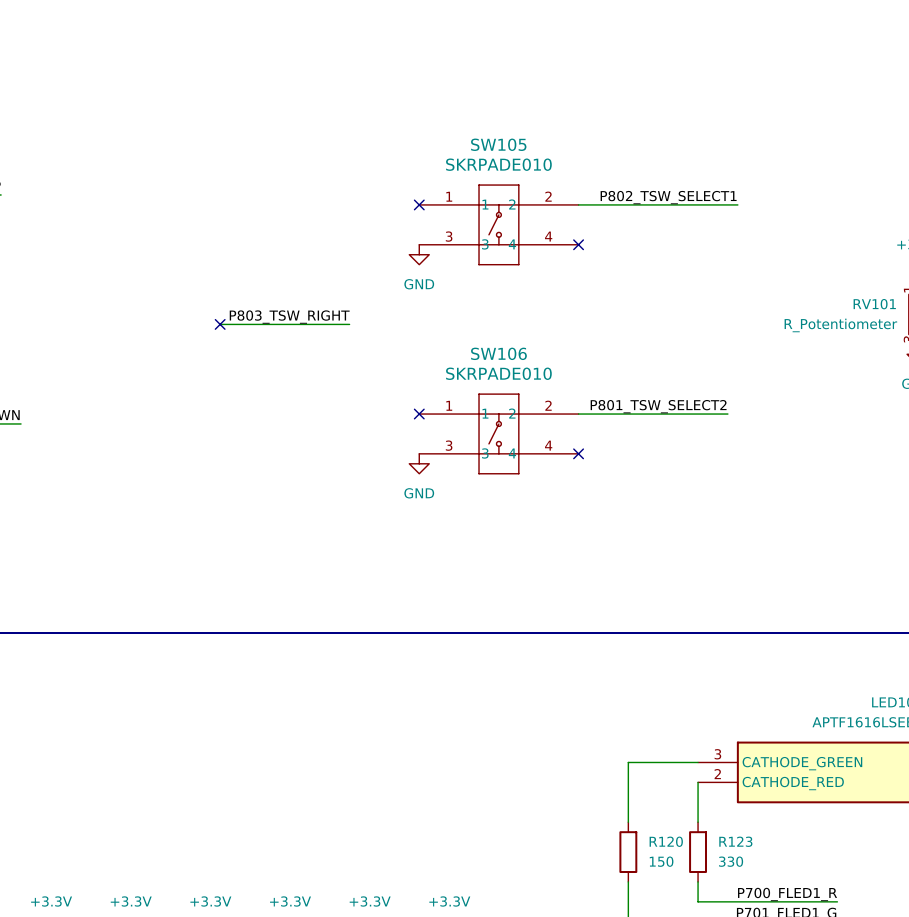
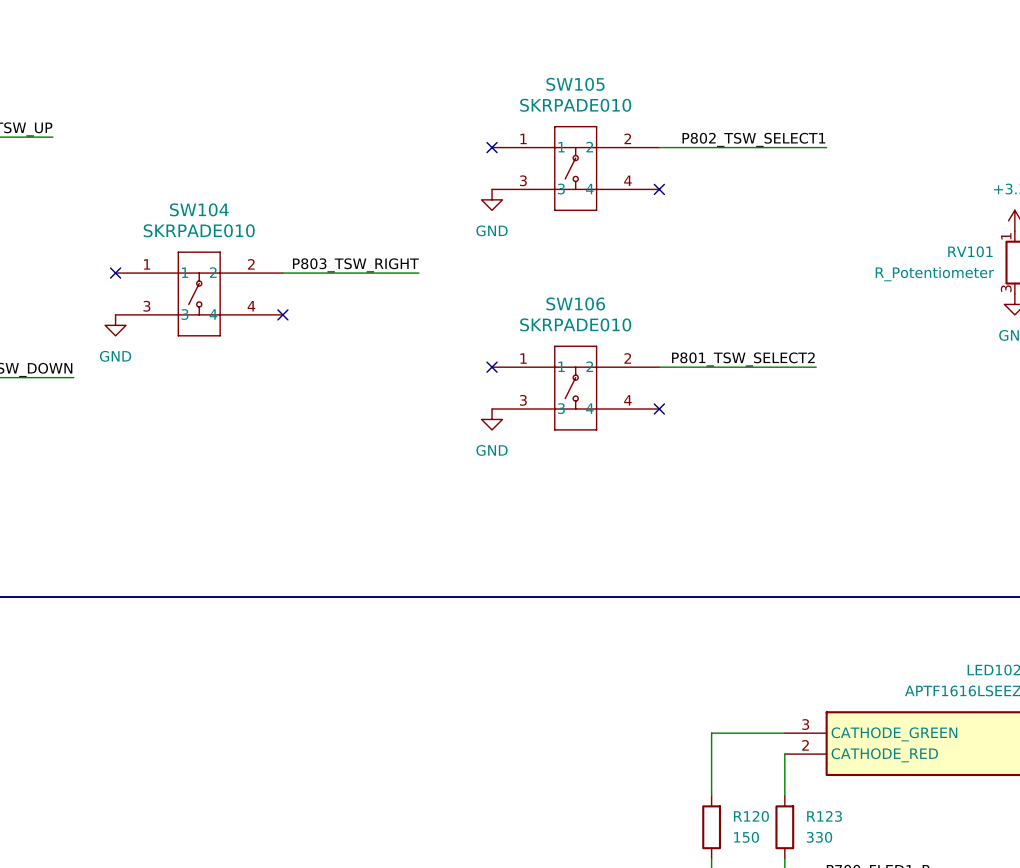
no-connect mark: none -> (115, 273)
no-connect mark position: (220, 324) -> (282, 314)
SW104: none -> SKRPADE010 (199, 293)
power symbol: none -> GND (115, 325)

